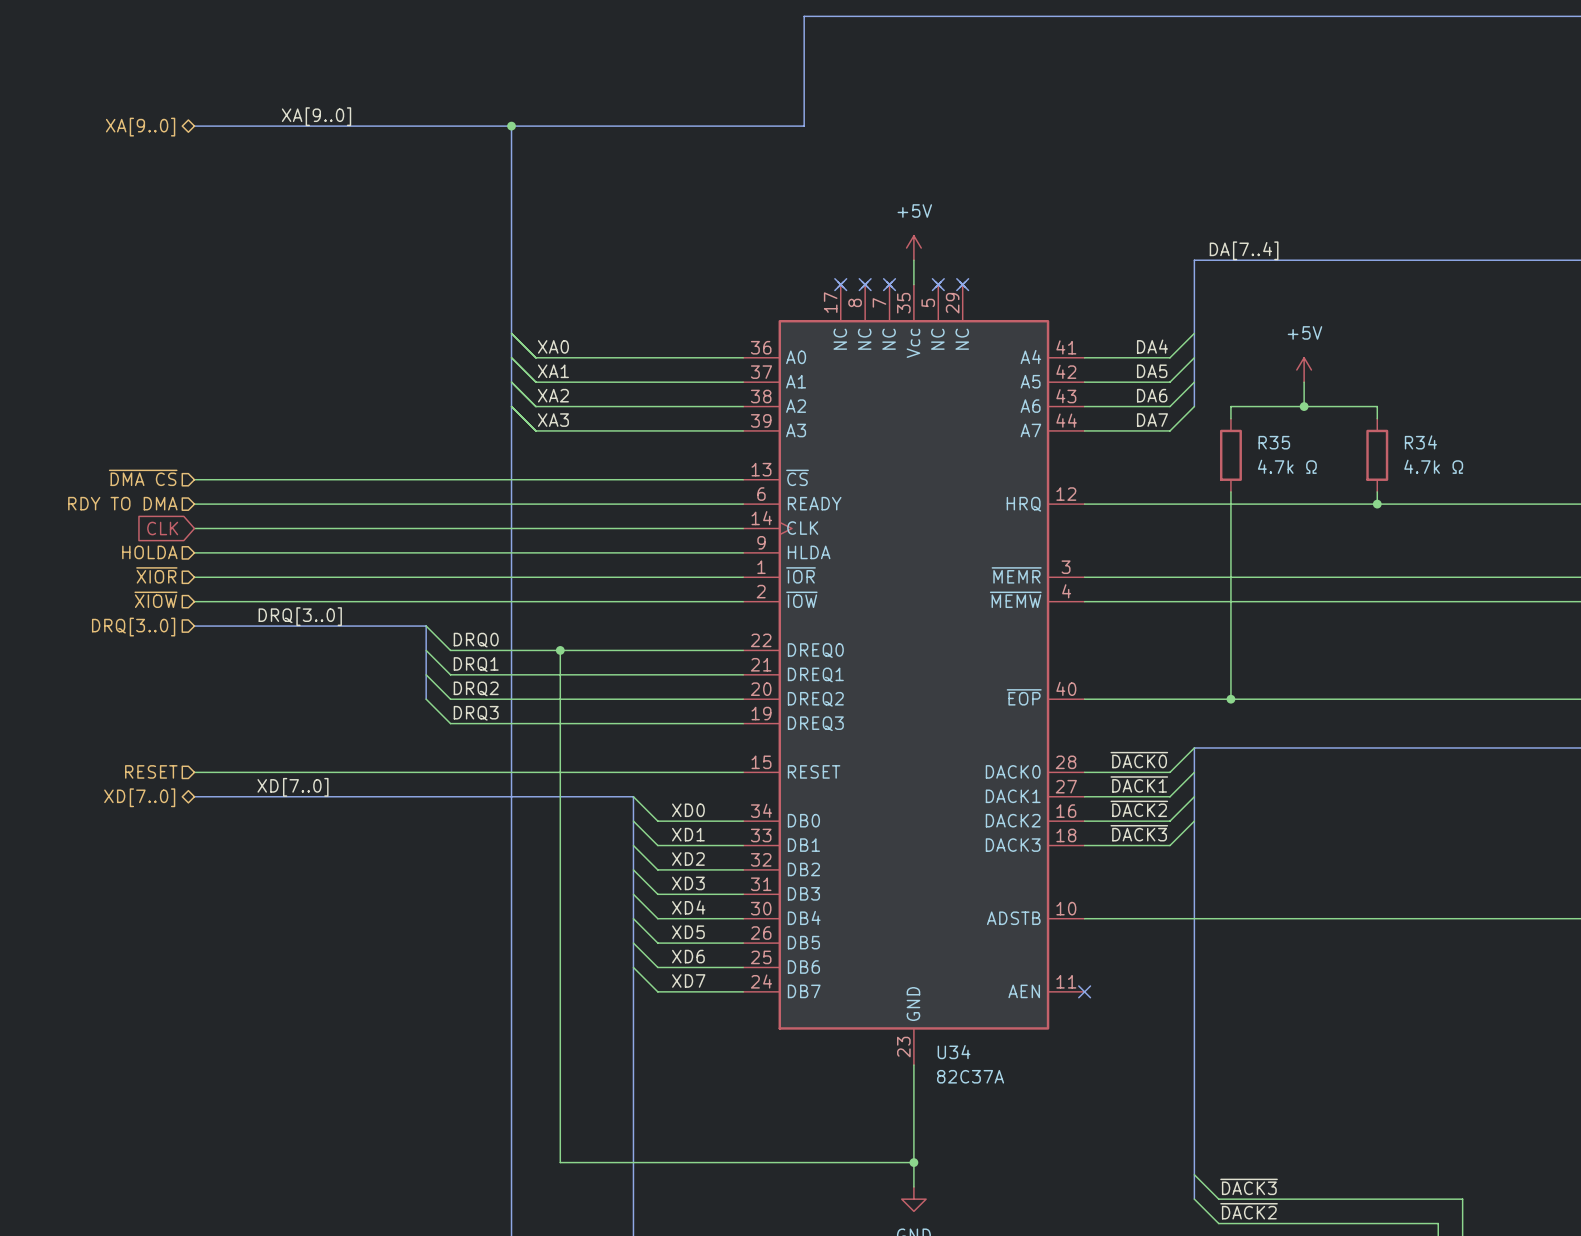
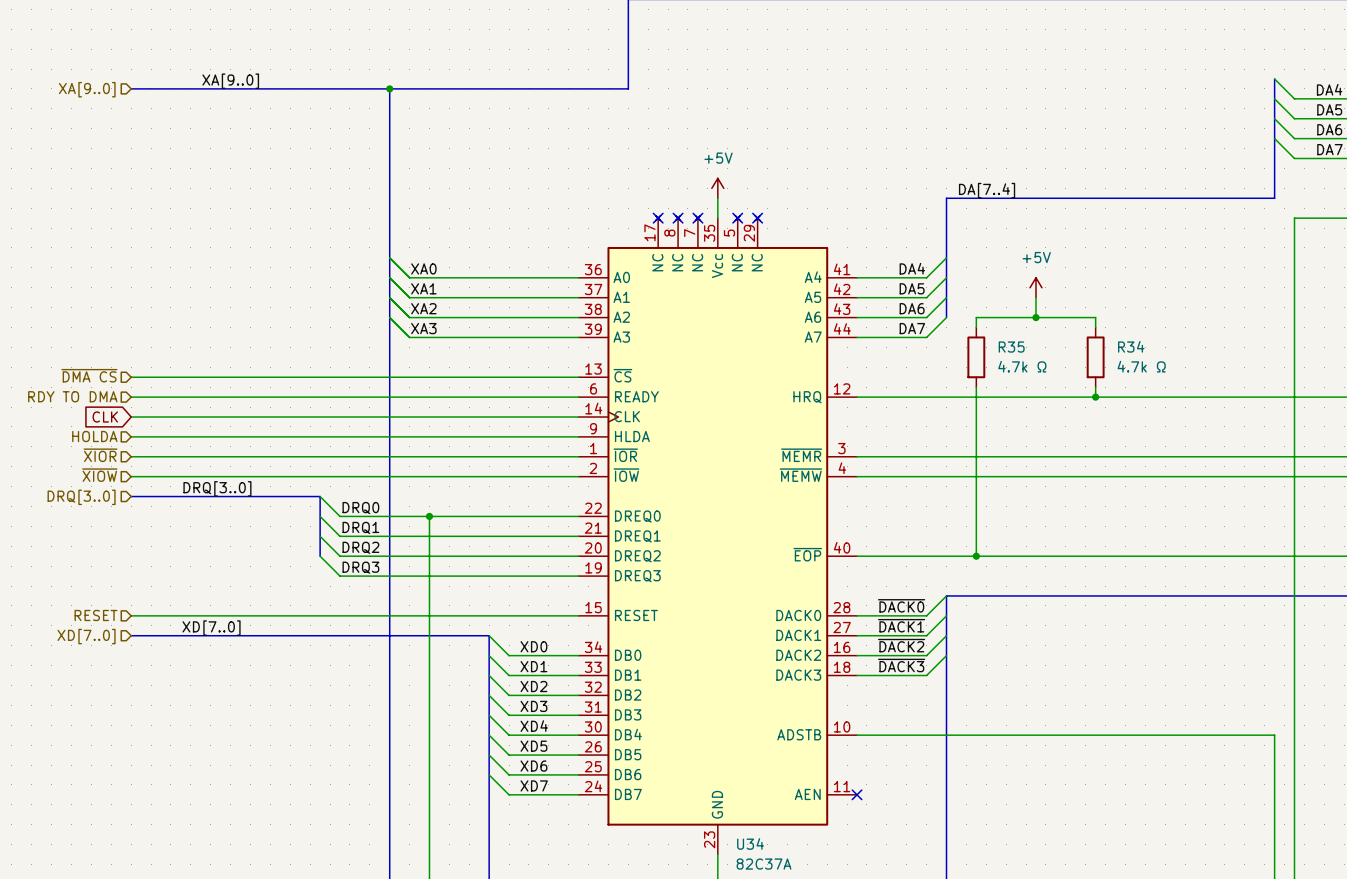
hierarchical label shape: bidirectional (140, 127) -> input (87, 89)
hierarchical label shape: bidirectional (139, 797) -> input (86, 636)

